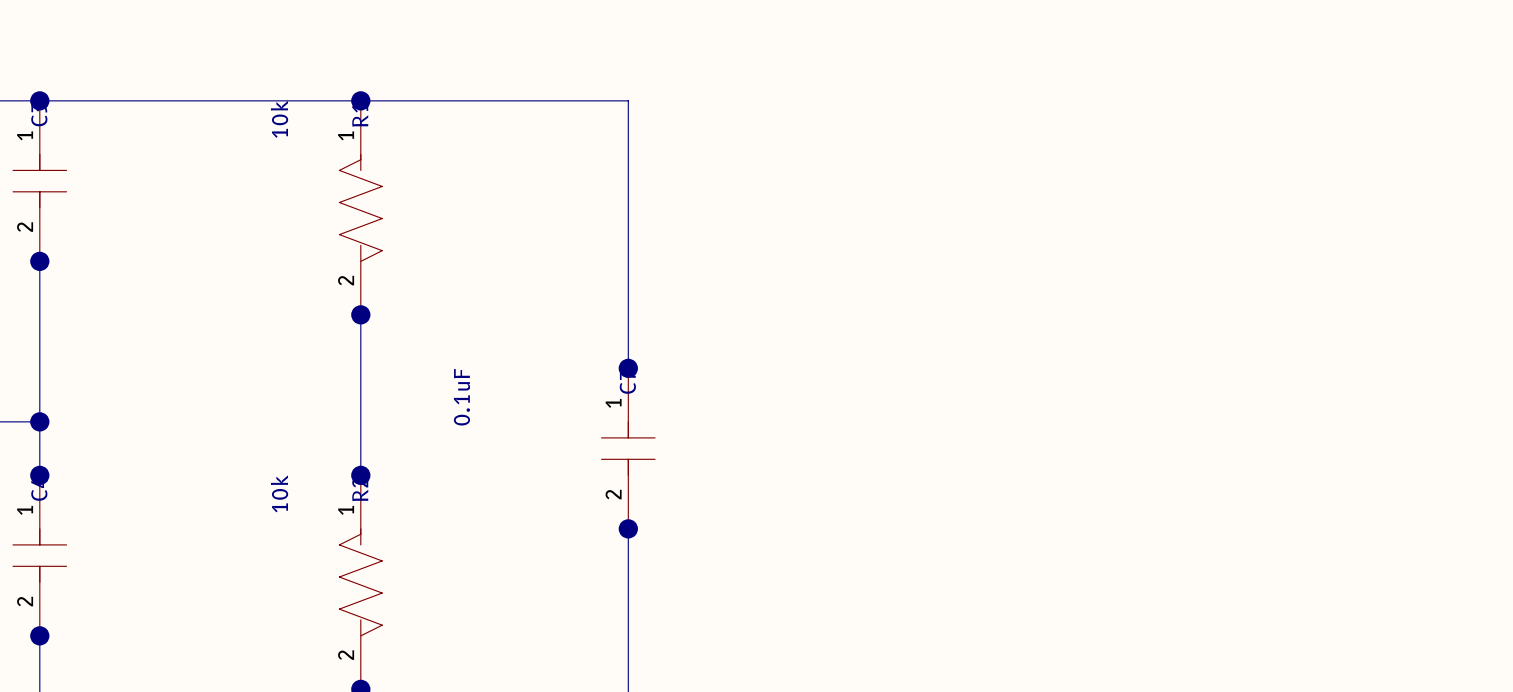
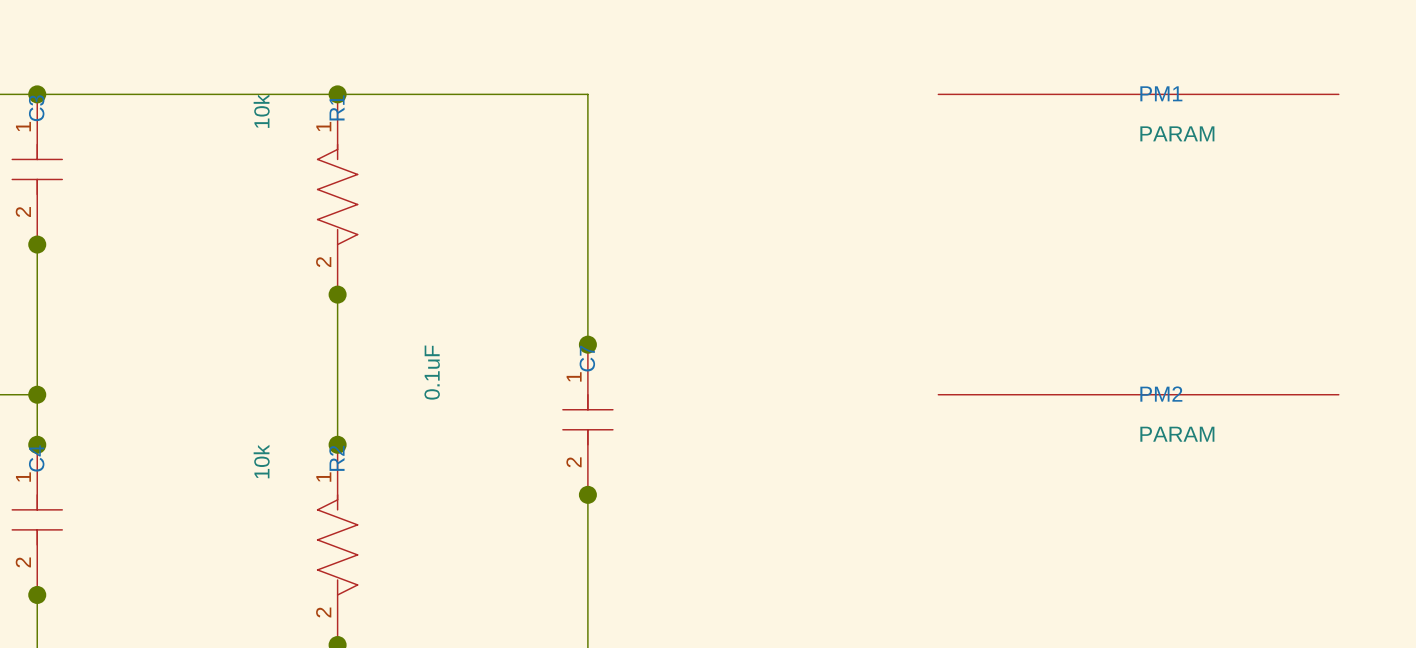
PM1: none -> PARAM (1138, 94)
PM2: none -> PARAM (1138, 394)

